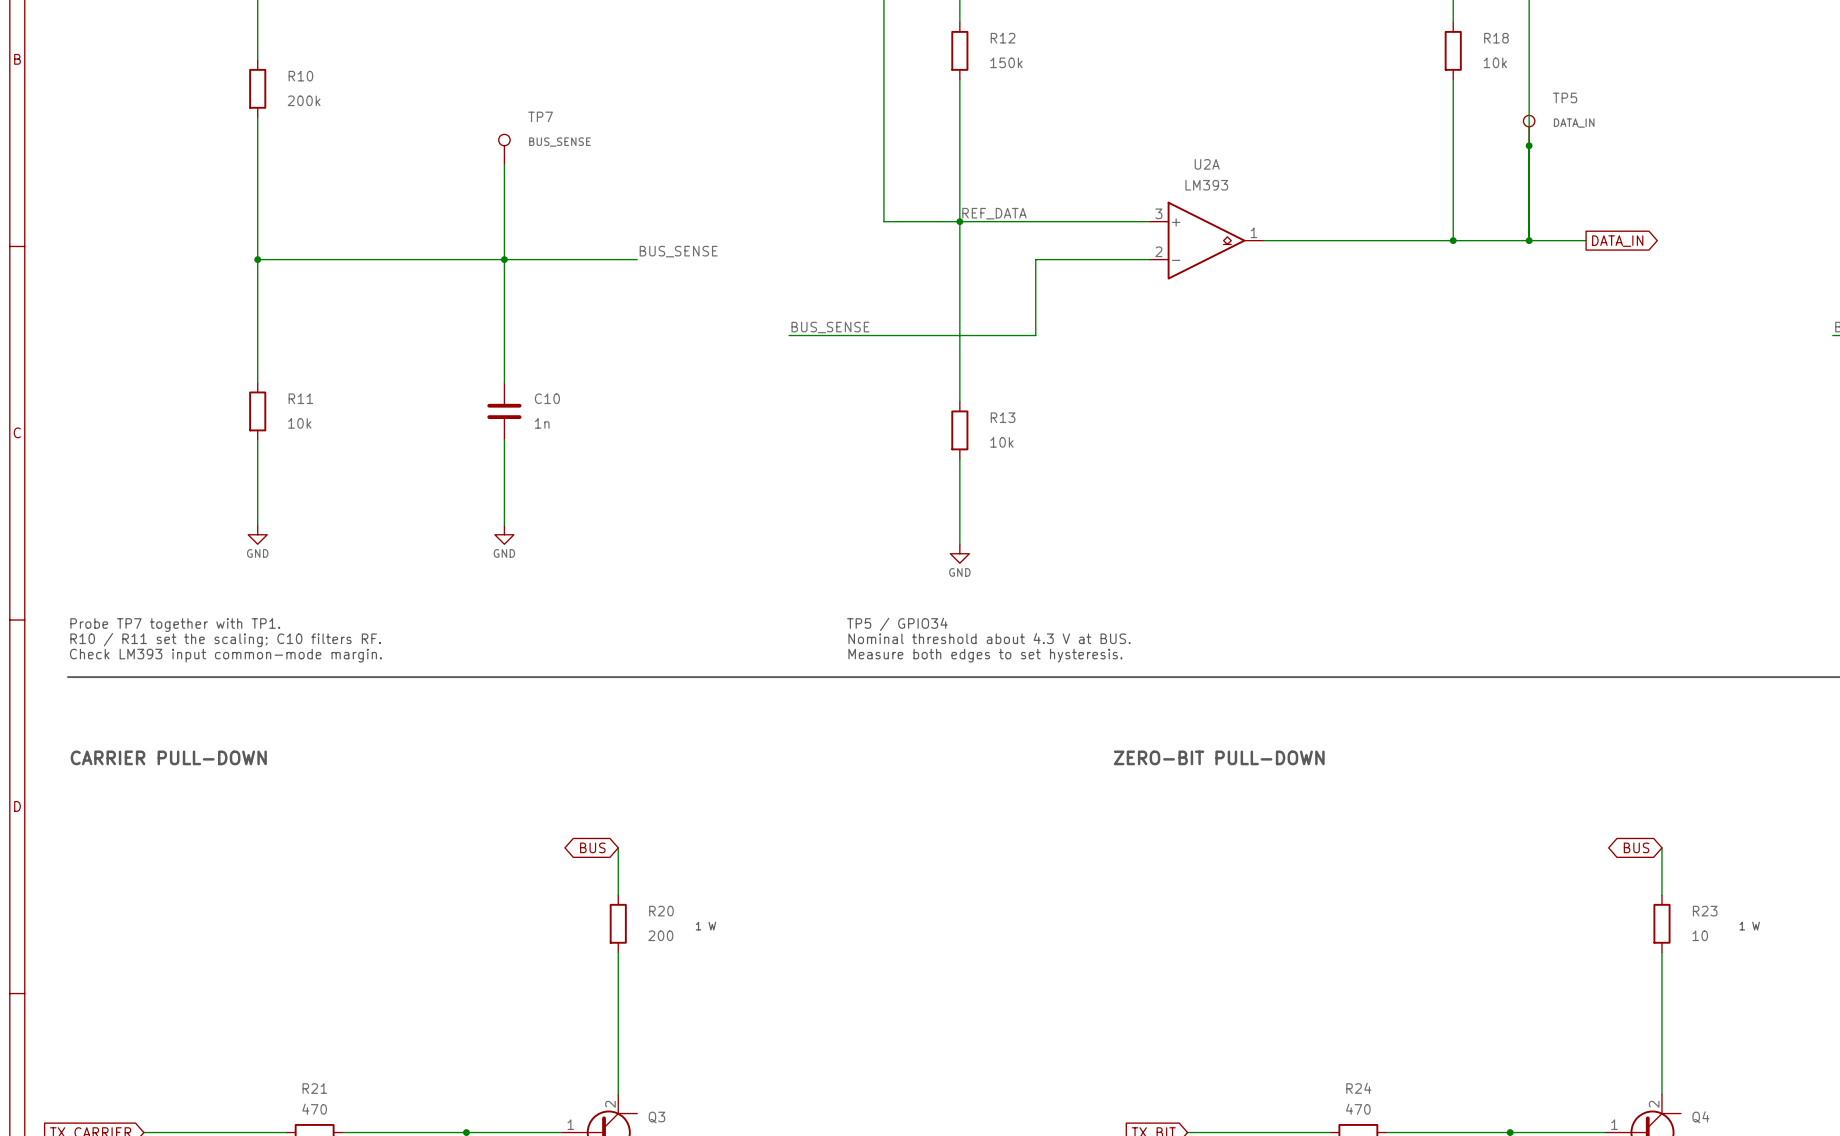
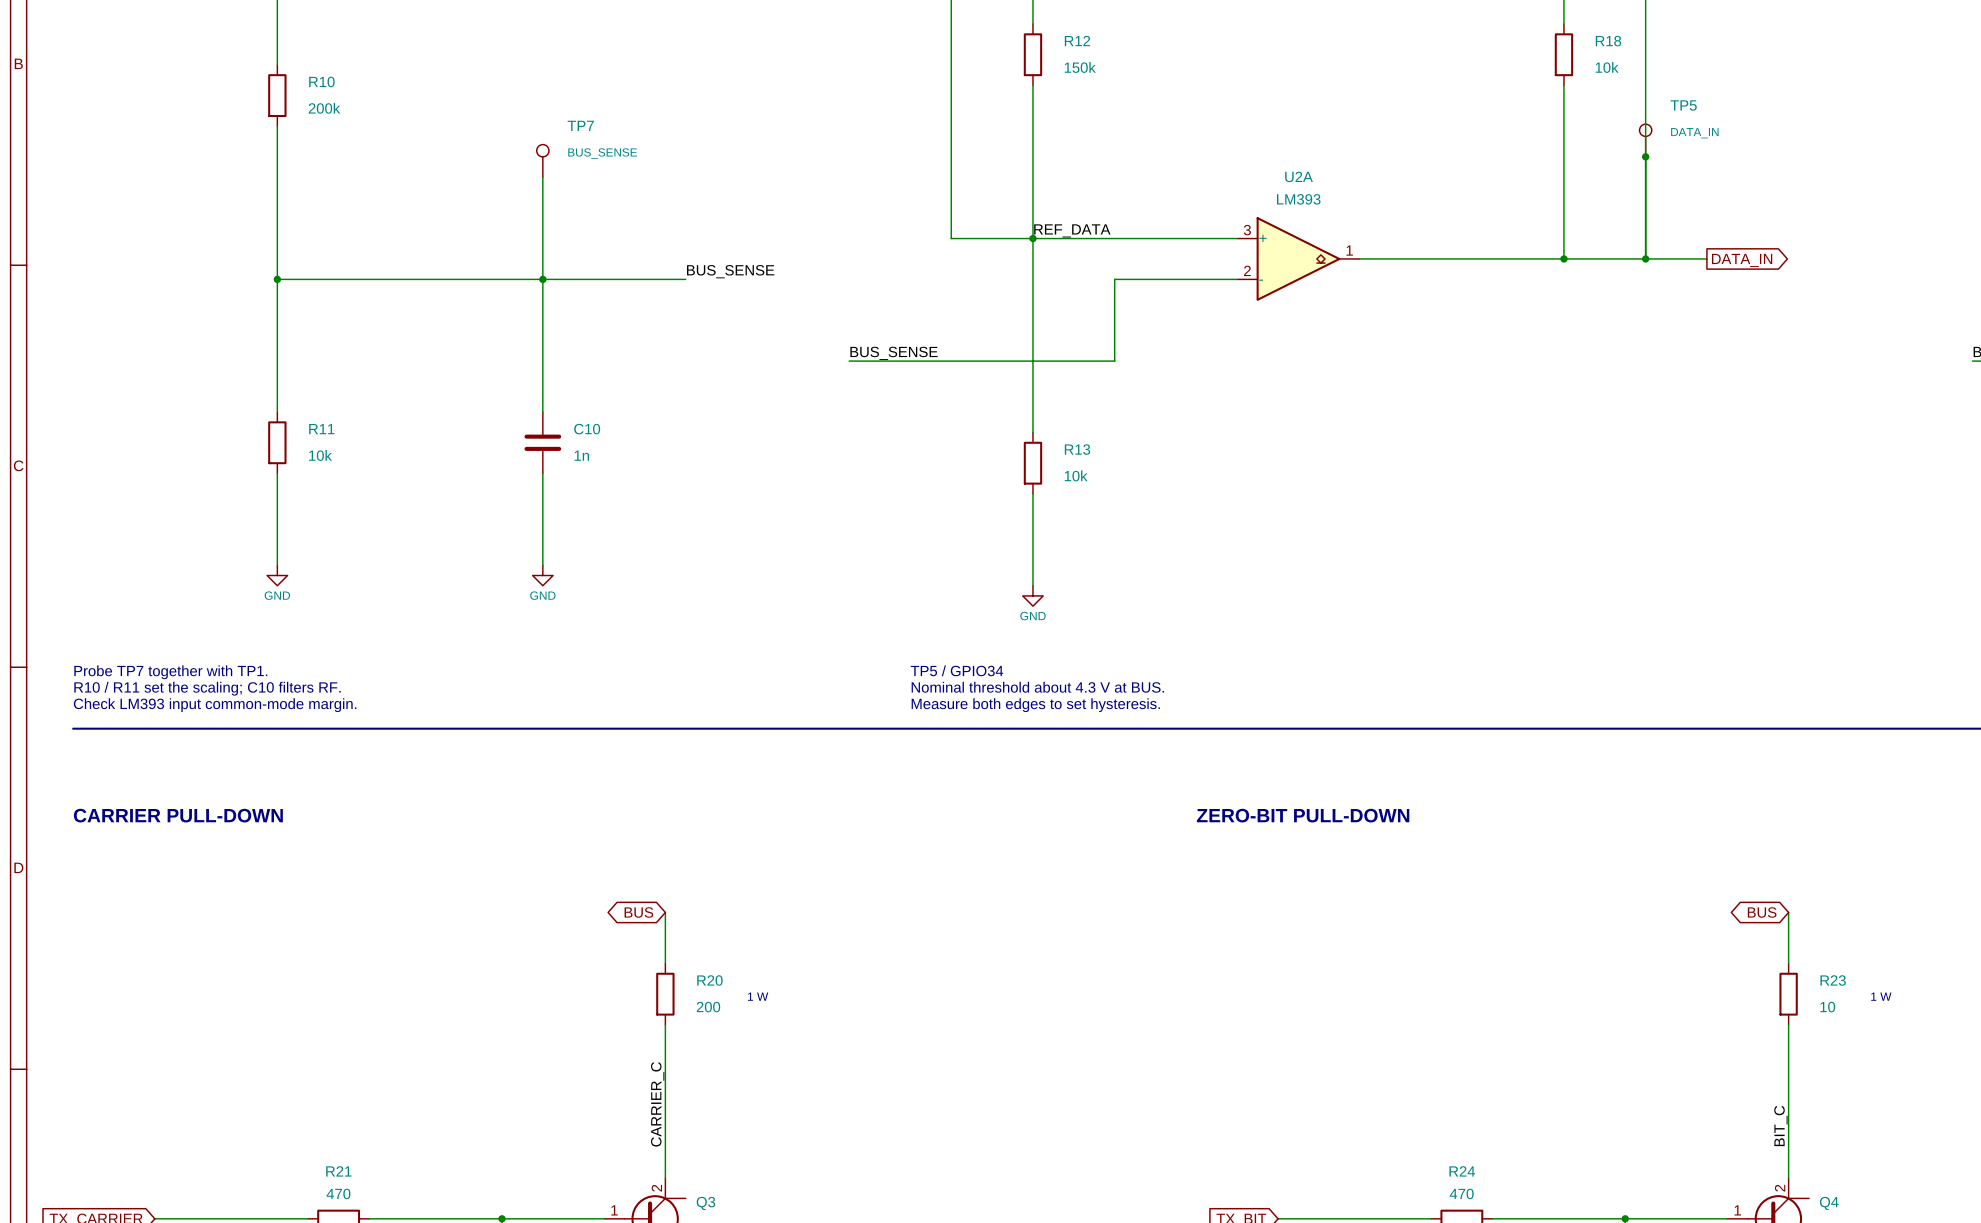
label: none -> CARRIER_C (657, 1104)
label: none -> BIT_C (1780, 1125)

